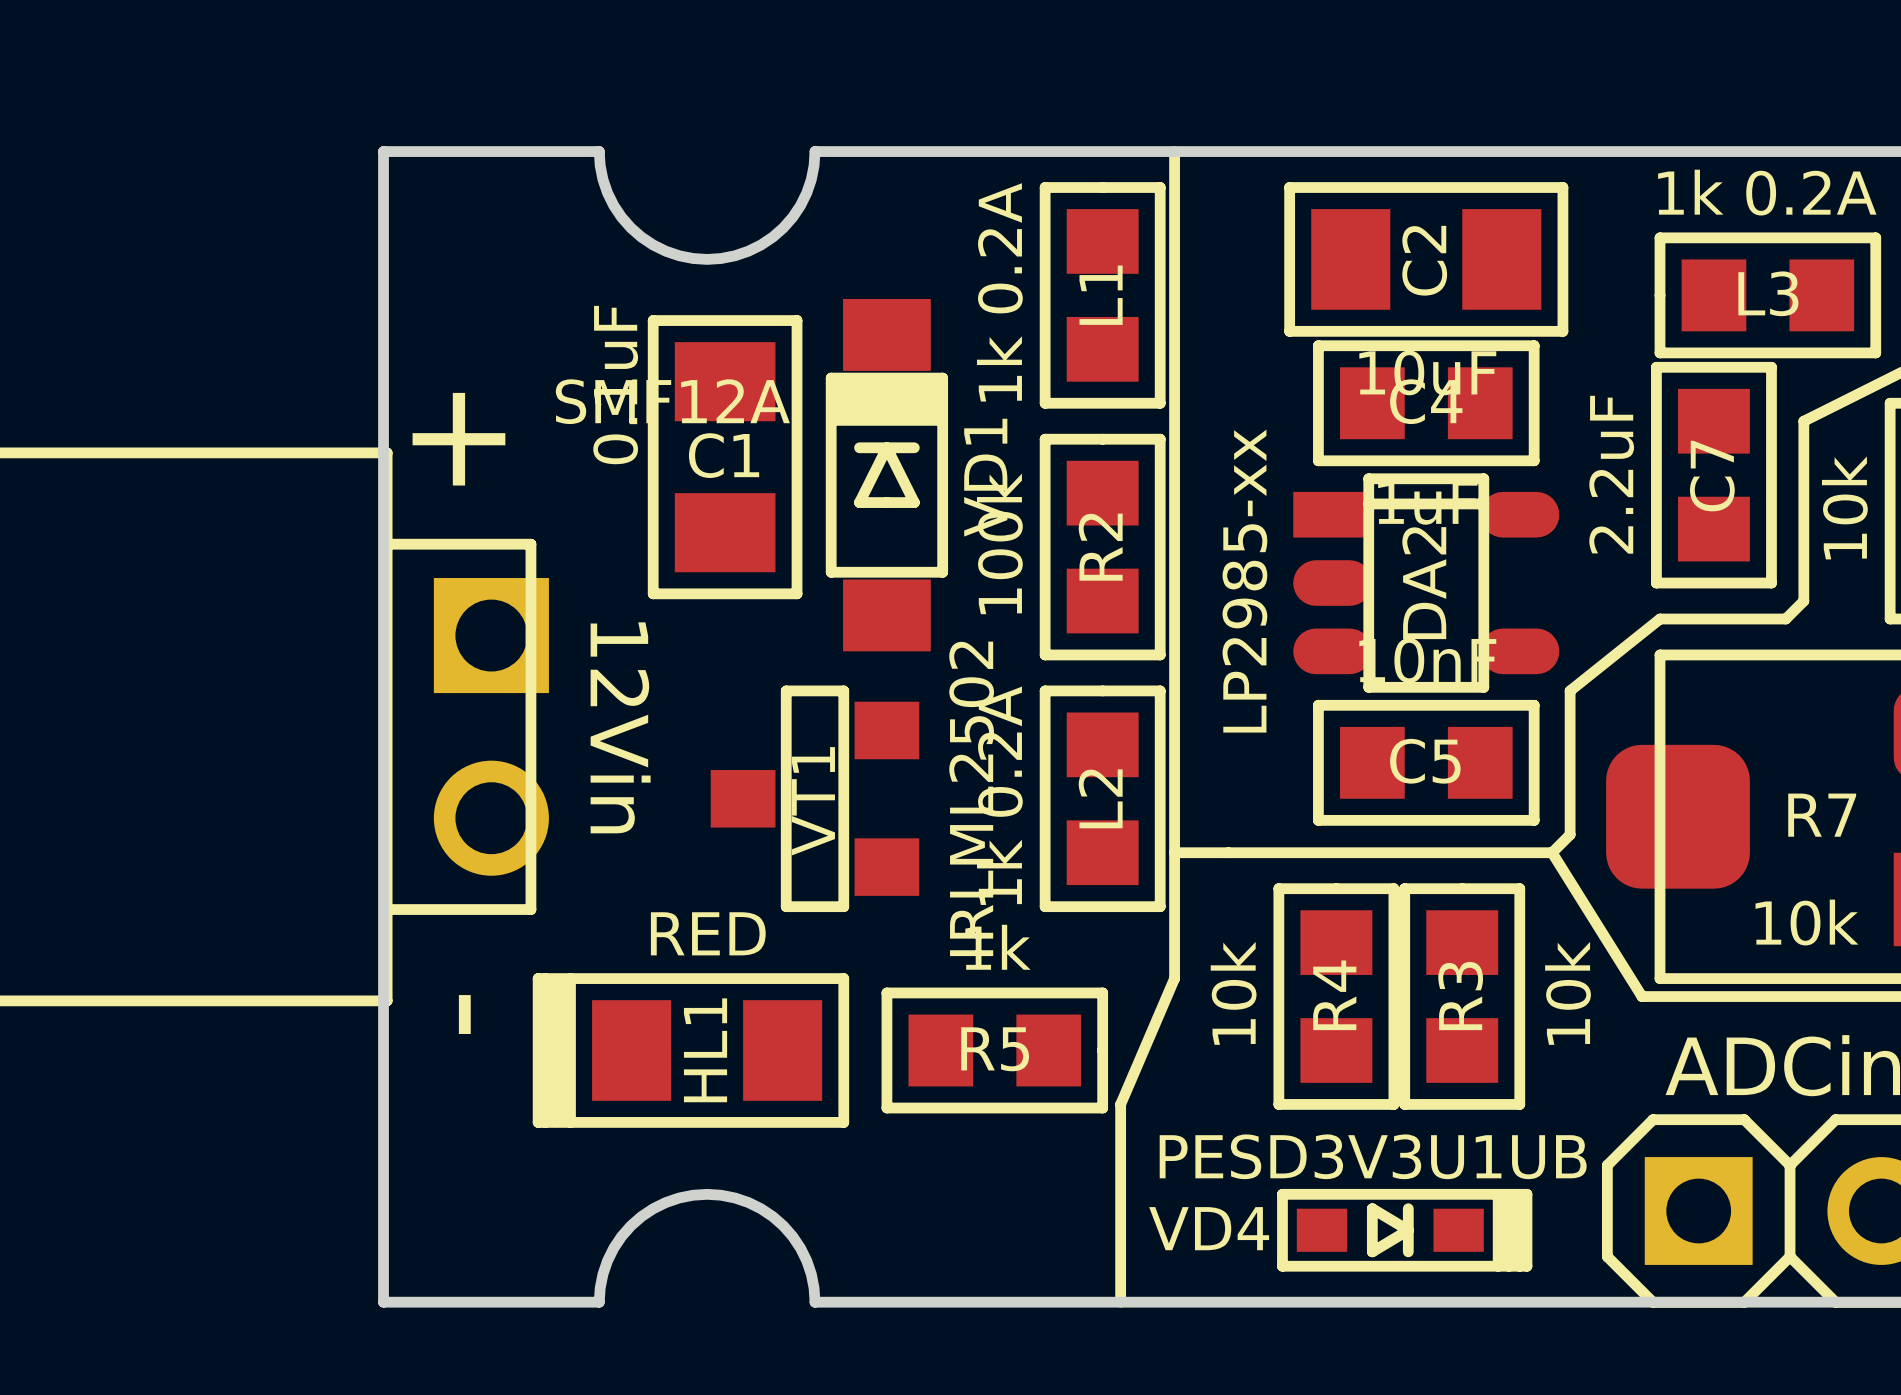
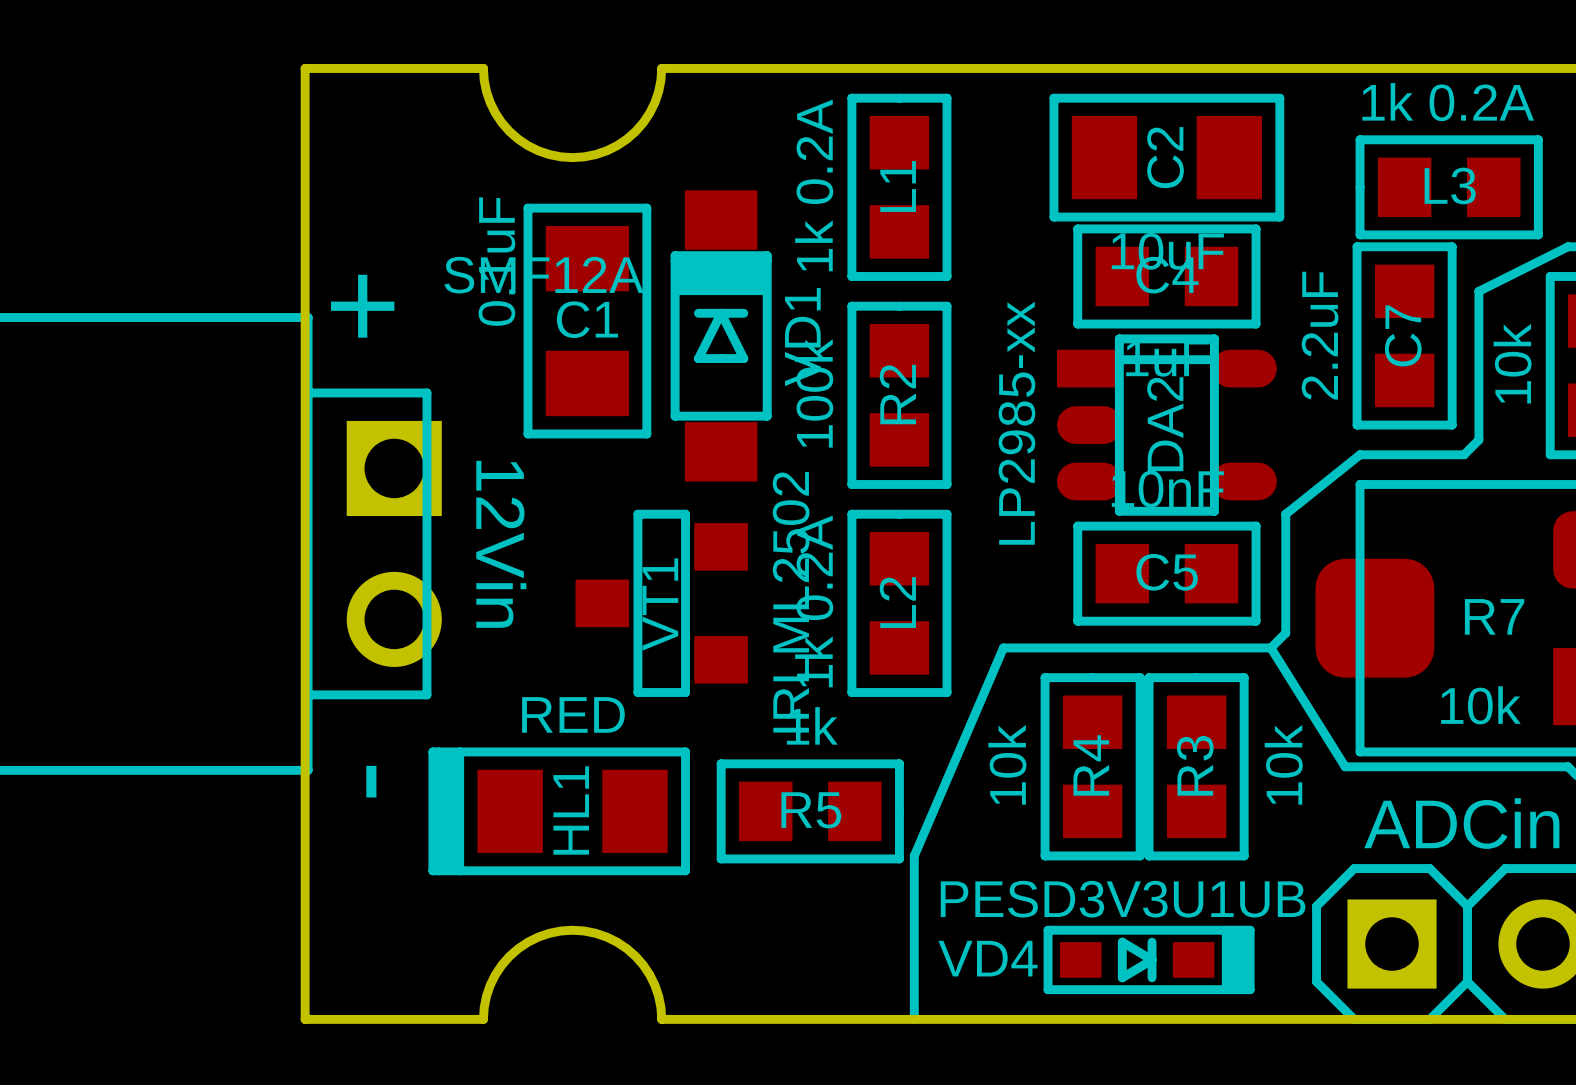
line: (1174, 151) (1174, 978) -> none
line: (1174, 852) (1228, 852) -> (958, 751) (1003, 647)

